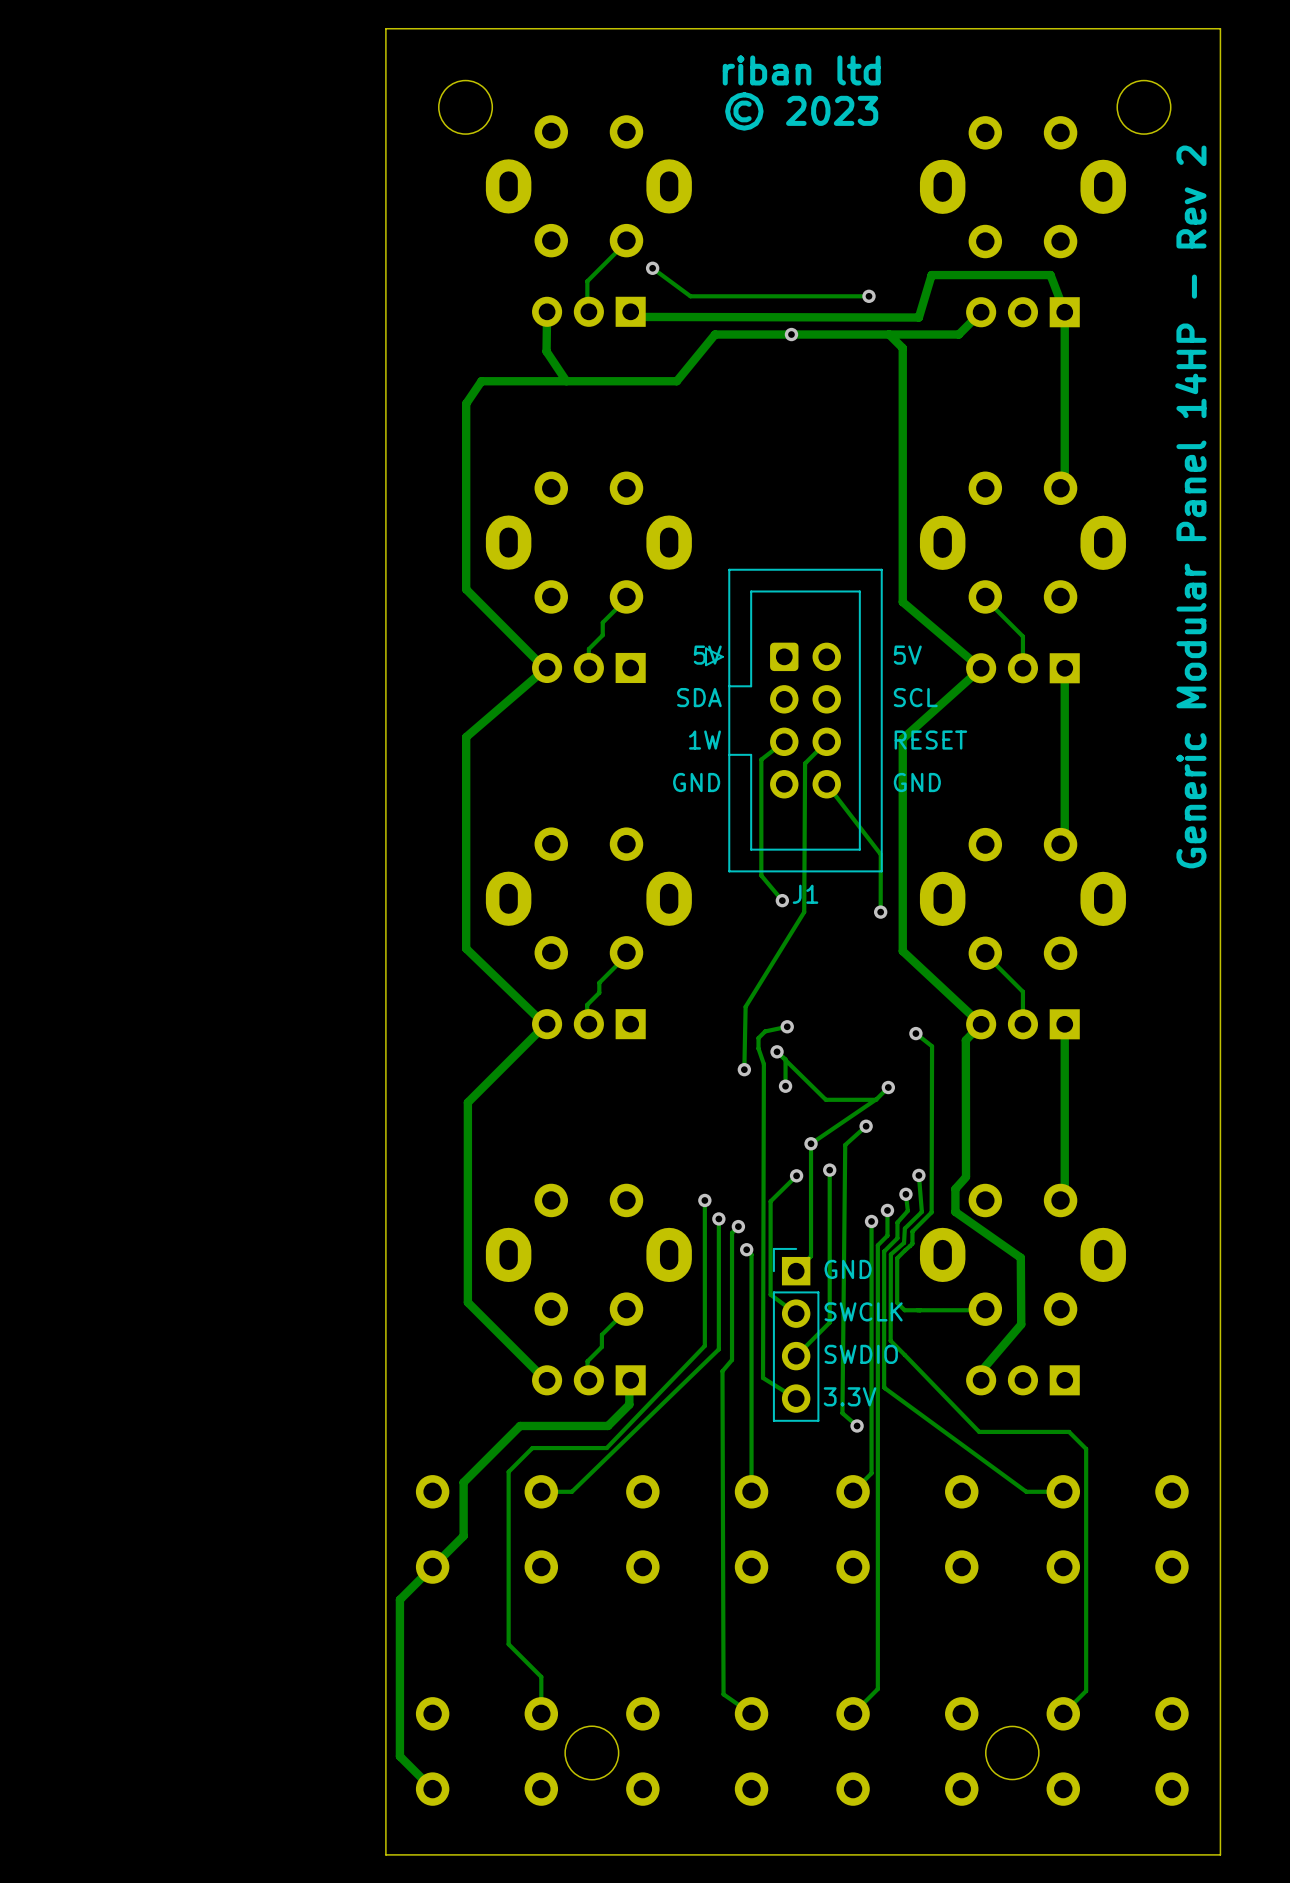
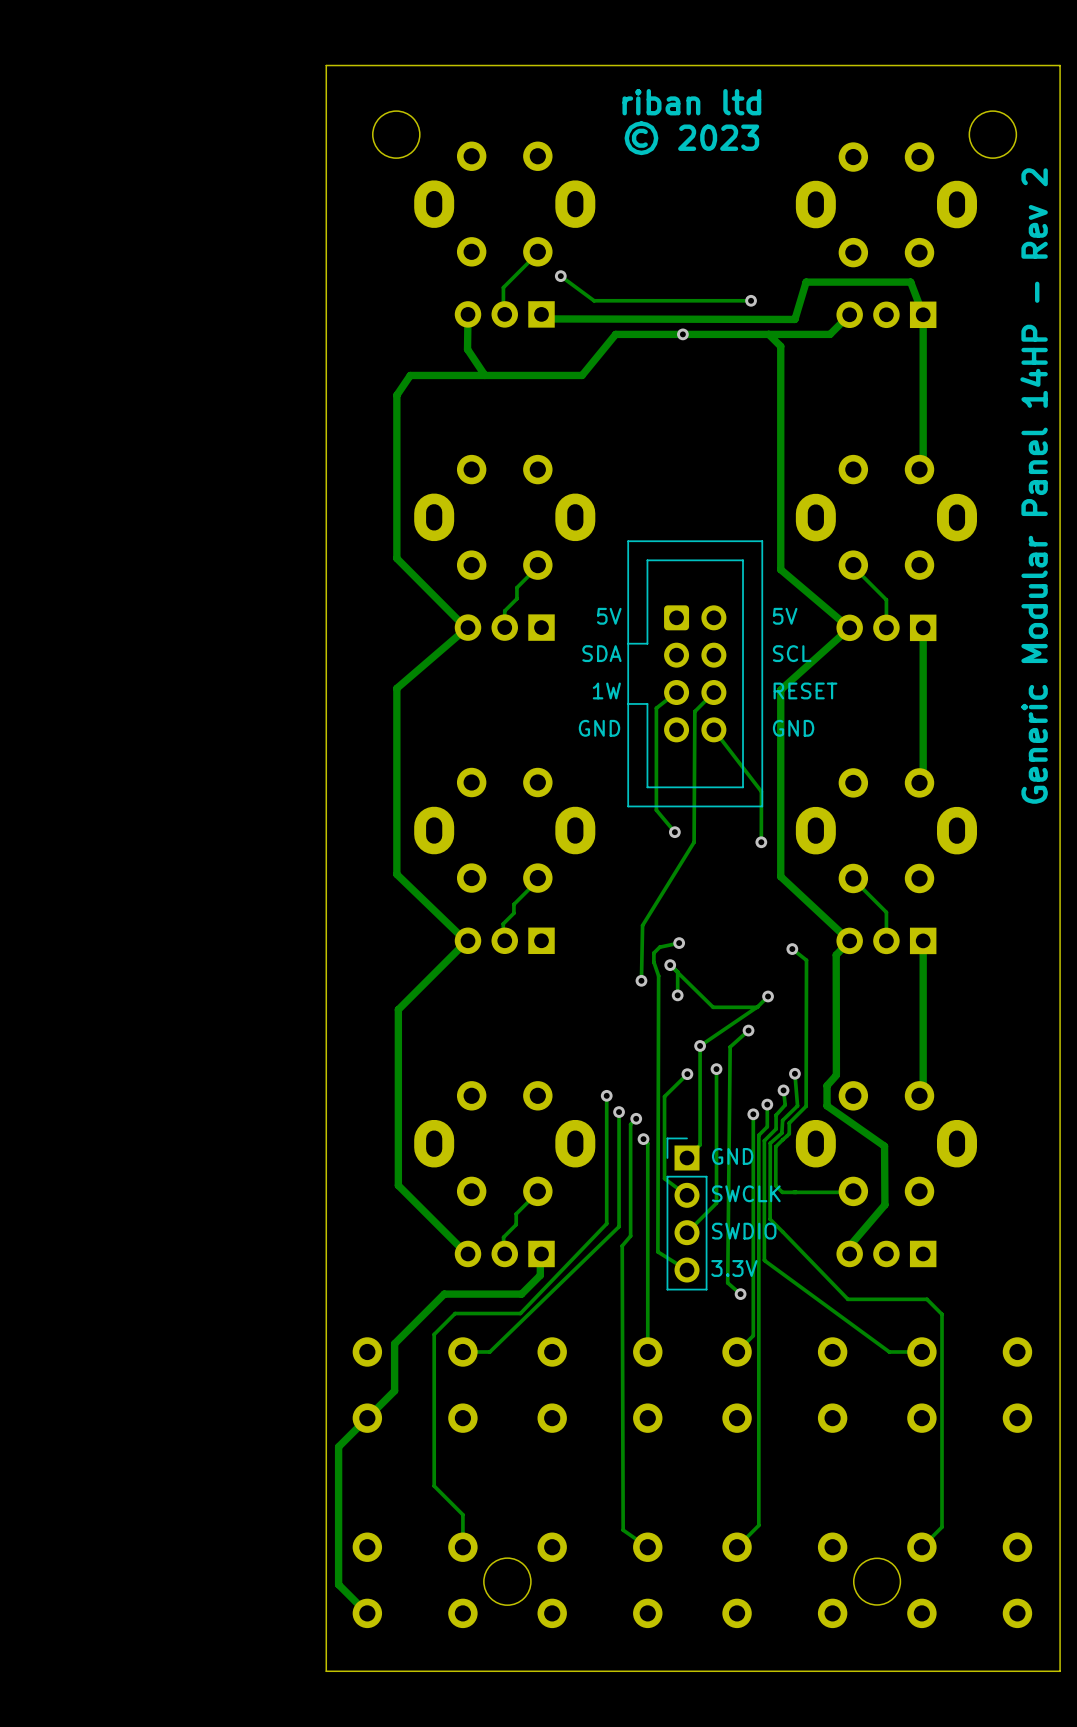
J1: (793, 720) -> none

